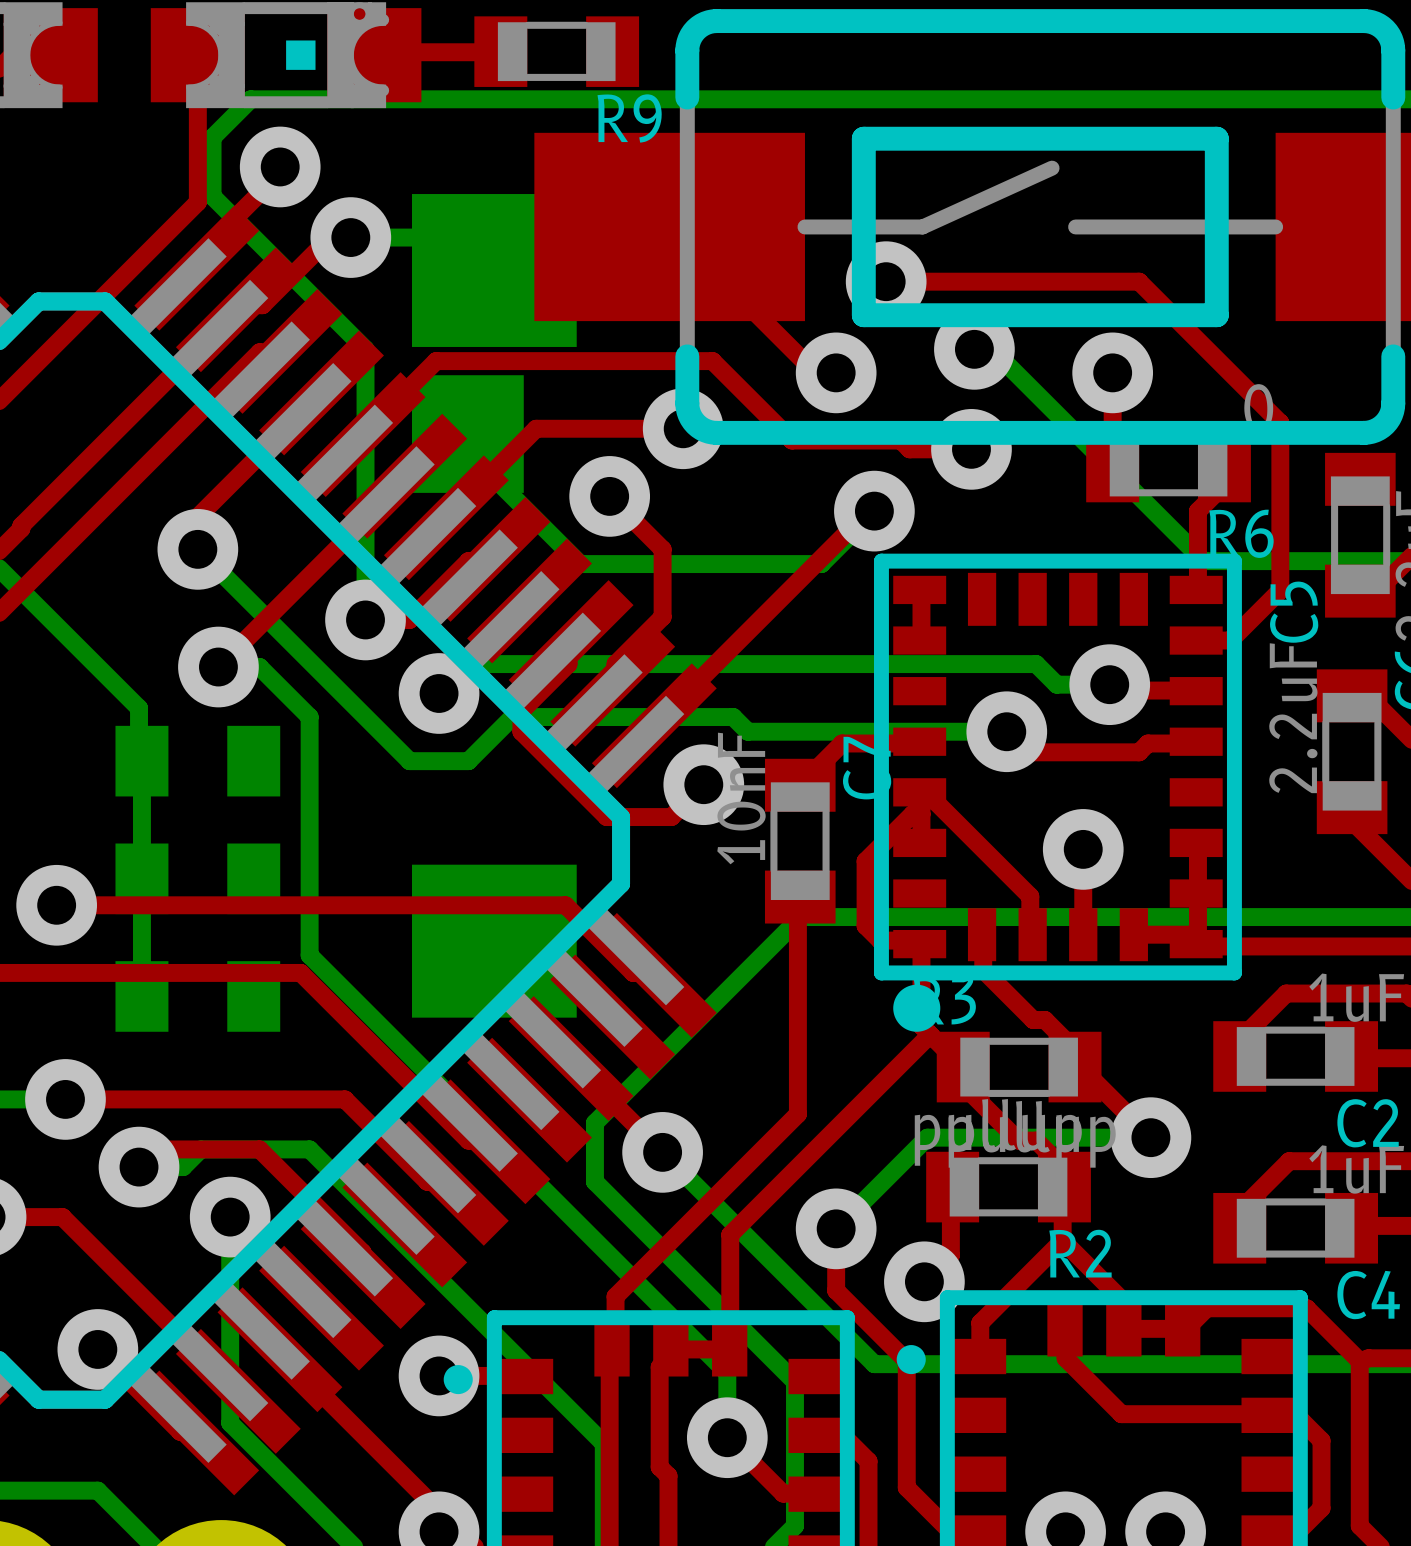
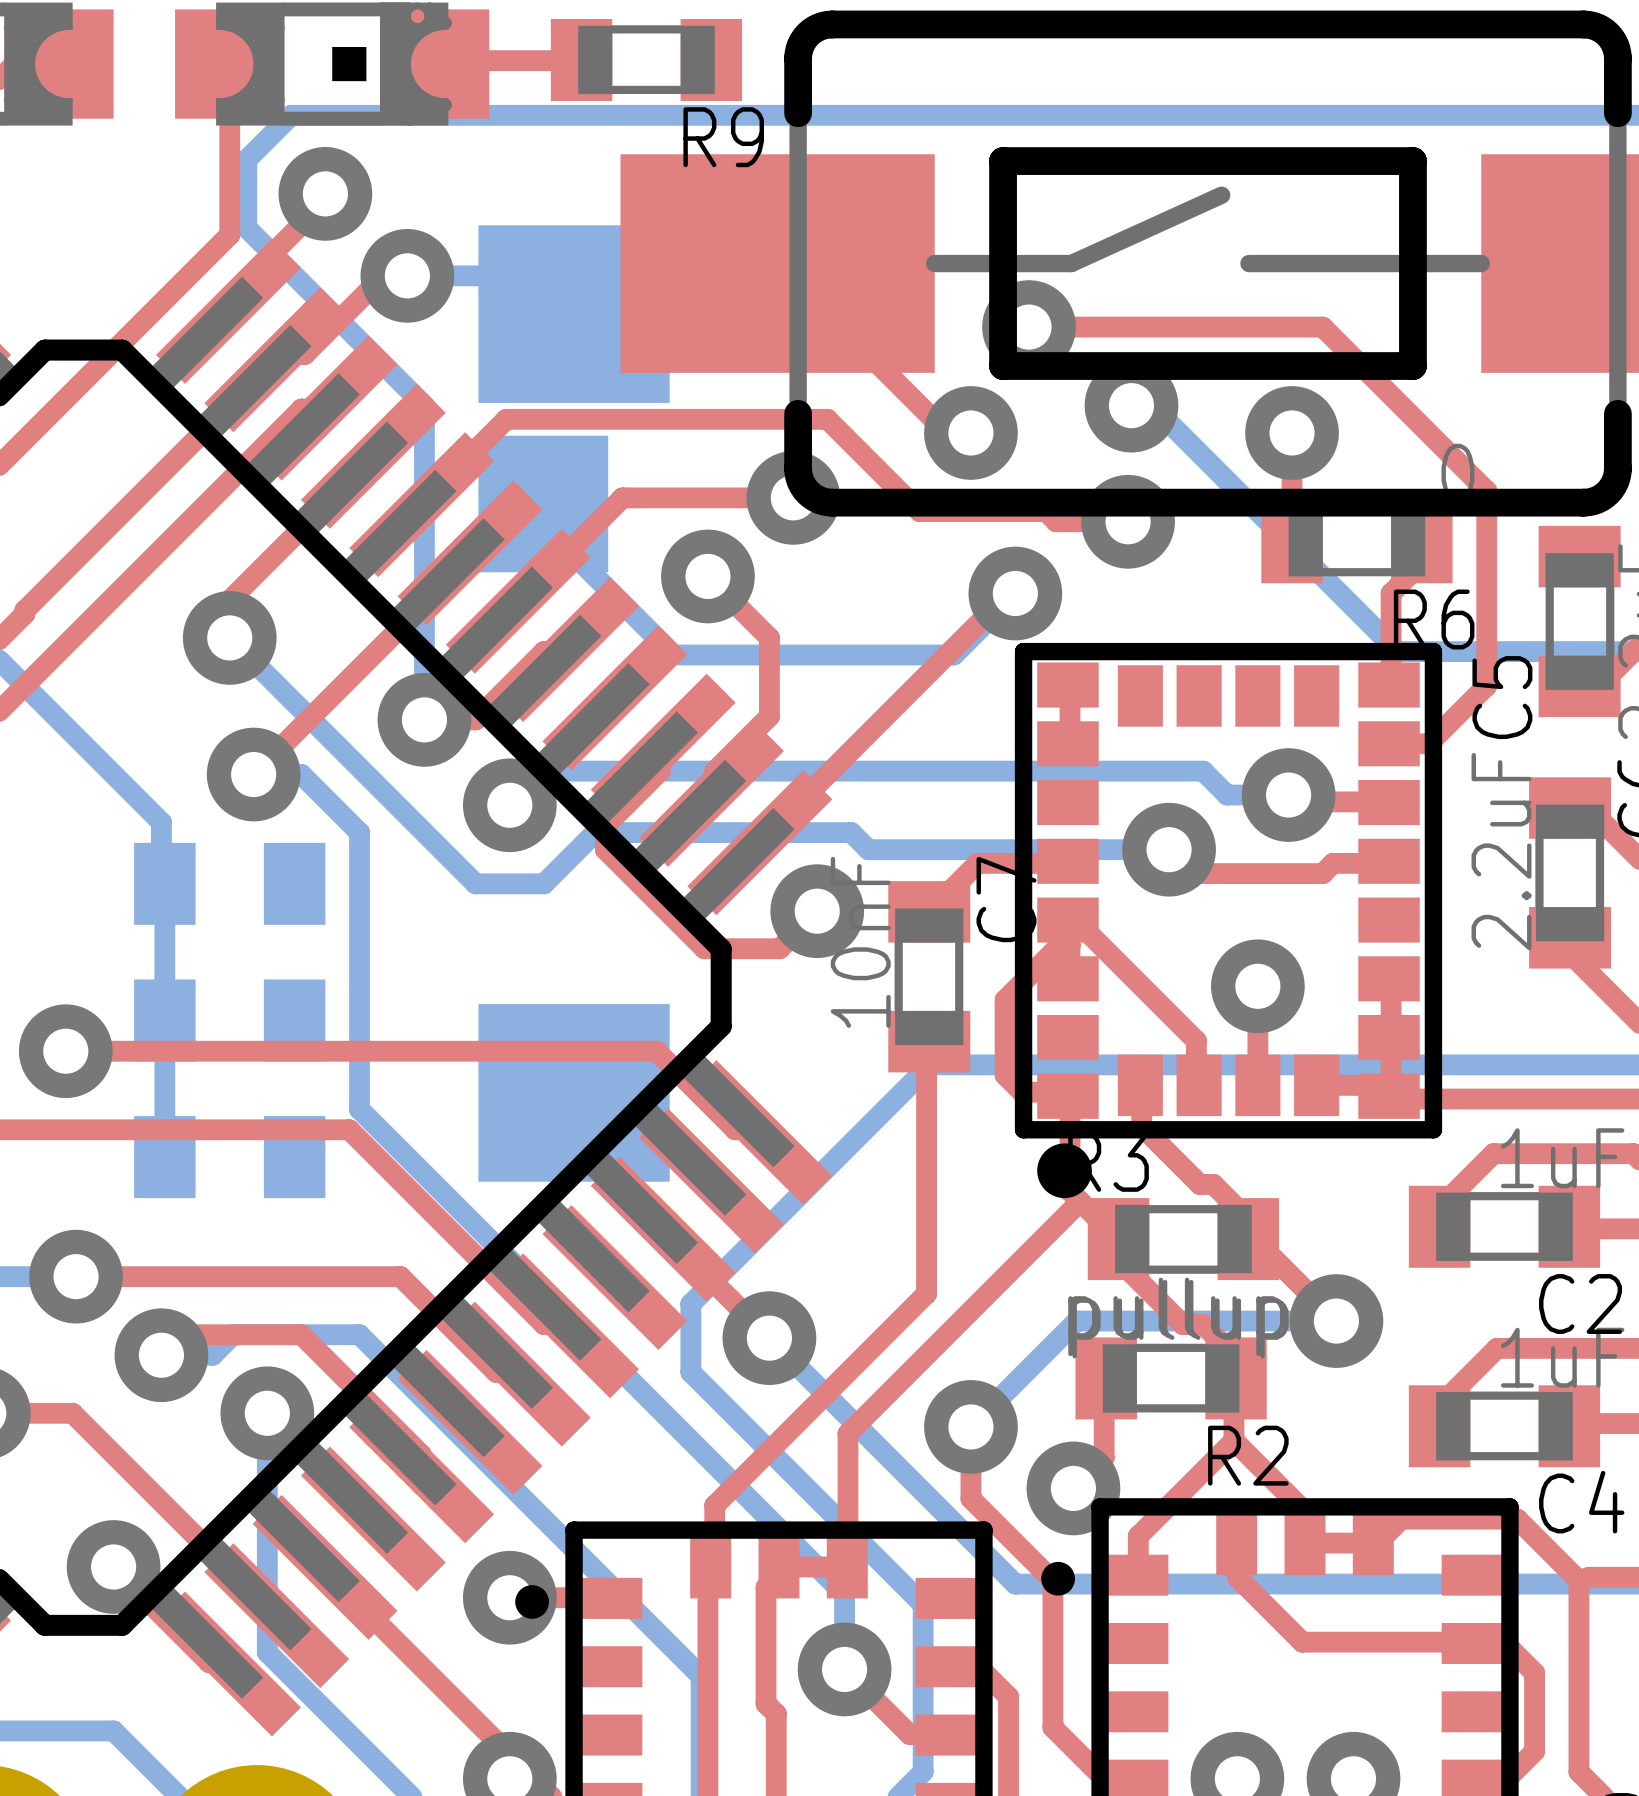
part footprint: [873, 553, 1242, 1032] -> [1014, 642, 1443, 1199]

